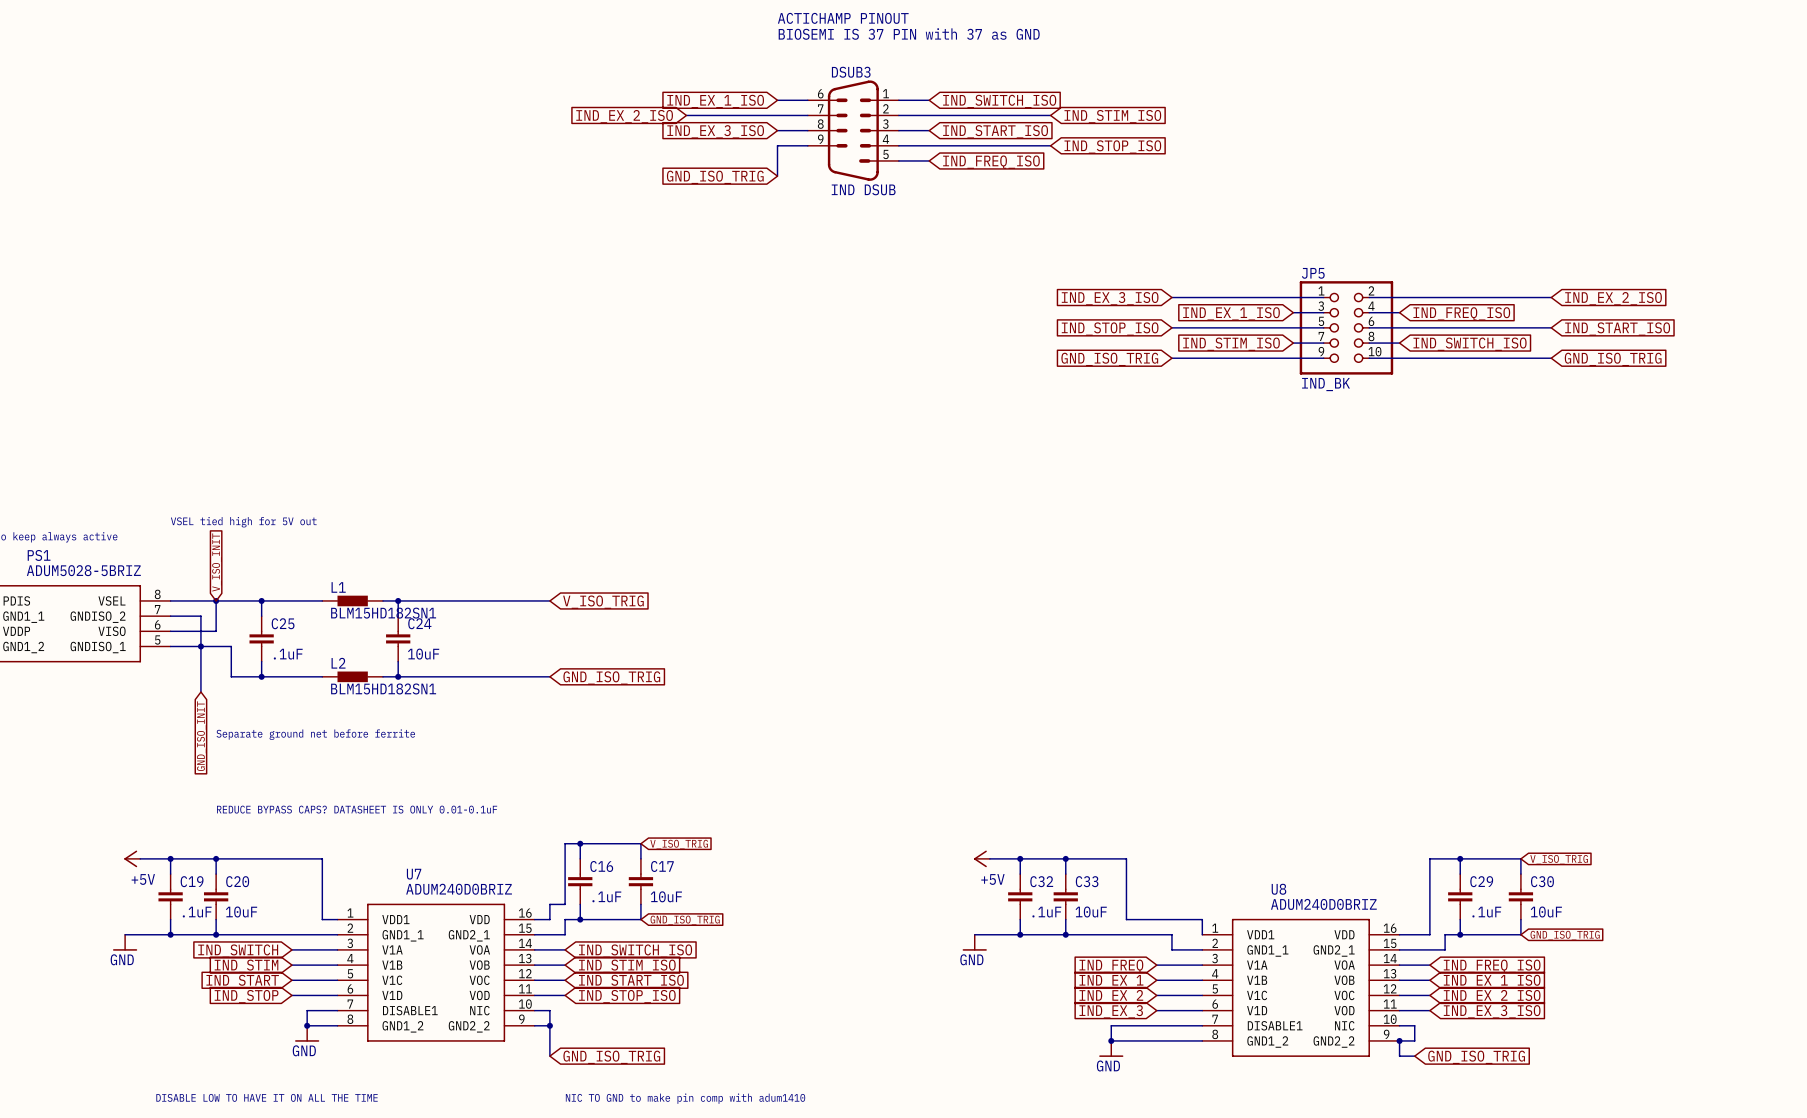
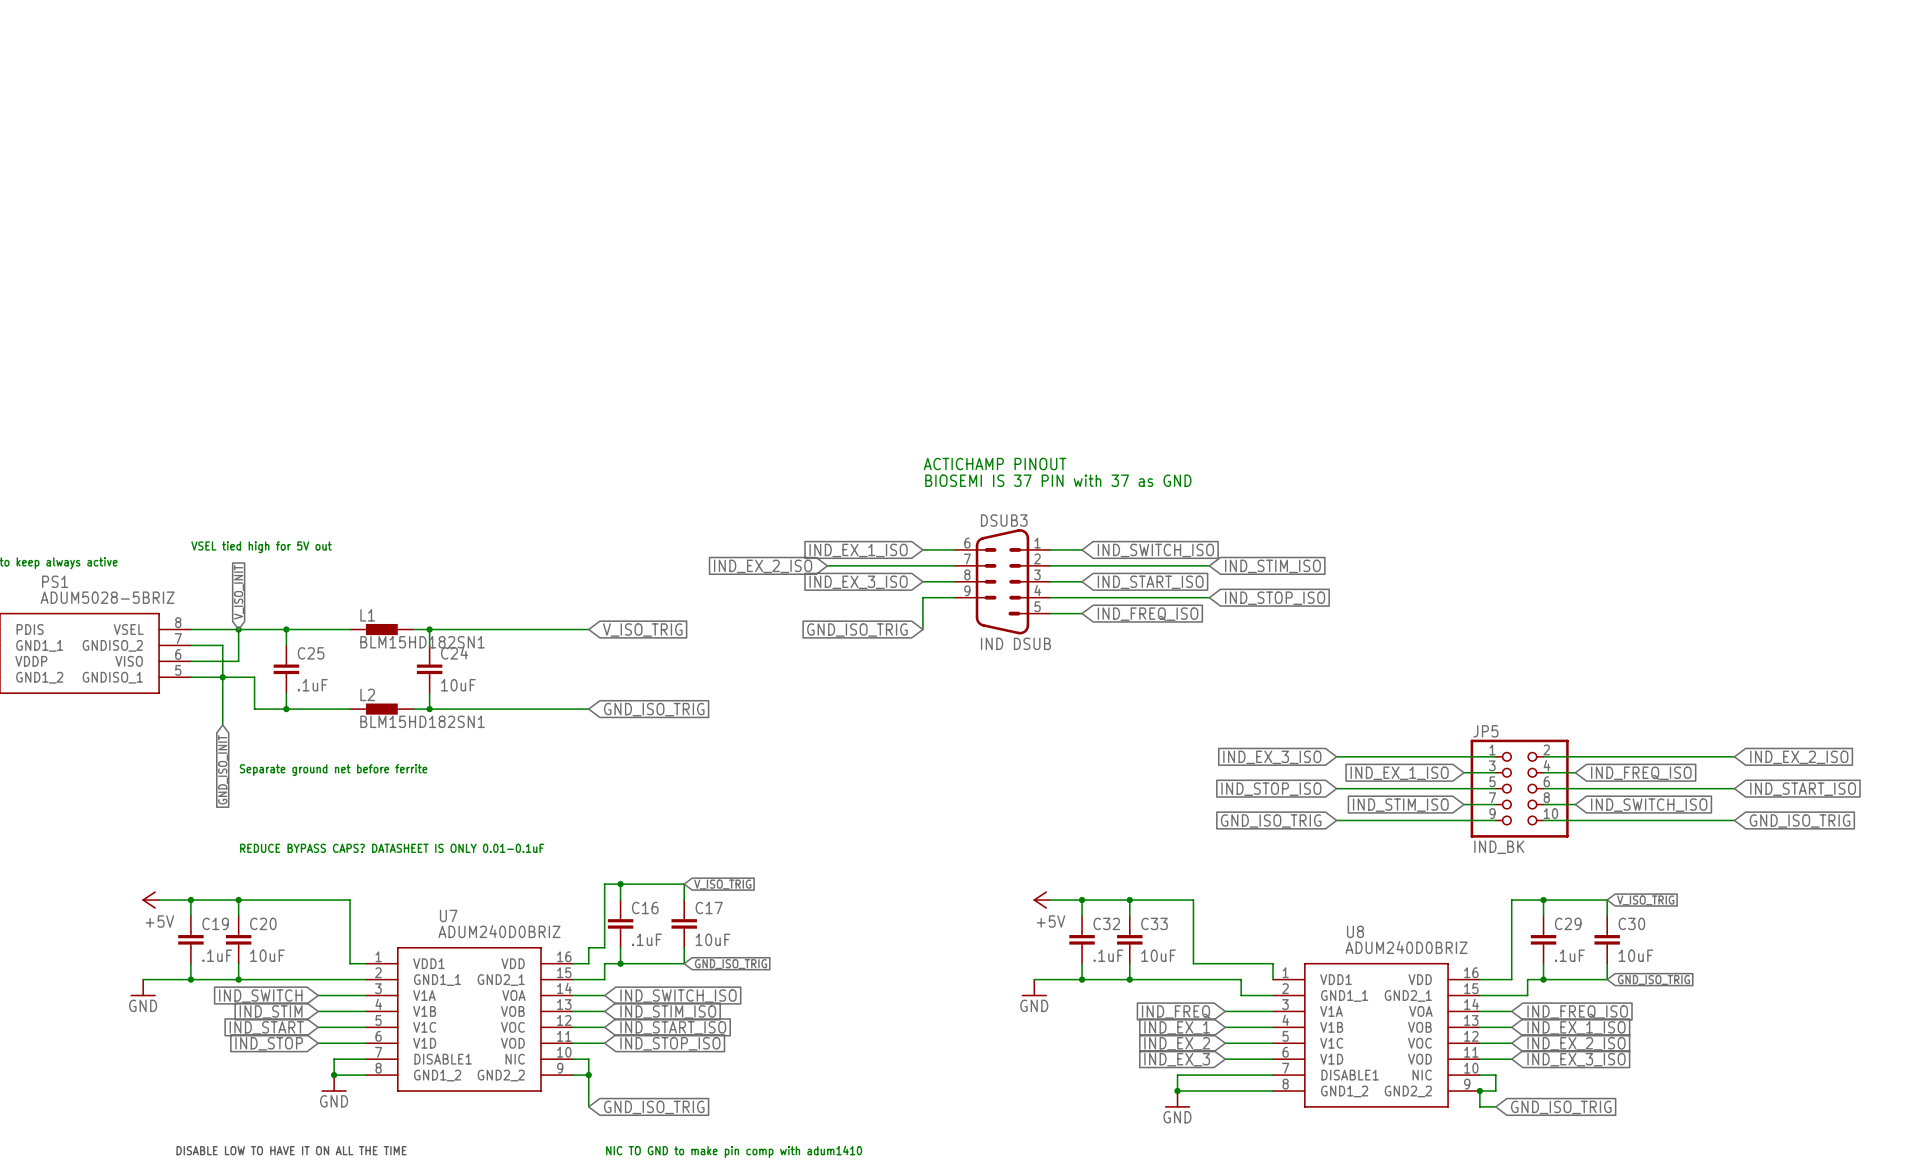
text: ACTICHAMP PINOUT (843, 18) -> none
text: BIOSEMI IS 37 PIN with 37 as GND (909, 34) -> none
wire: (777, 100) (807, 100) -> none
wire: (898, 100) (929, 100) -> none
global label: IND_EX_1_ISO (715, 101) -> none
global label: IND_SWITCH_ISO (999, 101) -> none
wire: (686, 115) (807, 115) -> none
wire: (898, 115) (1050, 115) -> none
global label: IND_EX_2_ISO (624, 116) -> none
global label: IND_STIM_ISO (1112, 116) -> none
wire: (777, 130) (807, 130) -> none
DSUB3 position: (853, 130) -> (1002, 581)
wire: (898, 130) (929, 130) -> none
global label: IND_EX_3_ISO (715, 131) -> none
global label: IND_START_ISO (995, 131) -> none
wire: (807, 145) (777, 145) (777, 176) -> none
wire: (898, 145) (1050, 145) -> none
global label: IND_STOP_ISO (1112, 147) -> none
wire: (898, 160) (929, 160) -> none
global label: IND_FREQ_ISO (991, 162) -> none
global label: GND_ISO_TRIG (715, 177) -> none
wire: (1171, 297) (1323, 297) -> none
wire: (1369, 297) (1551, 297) -> none
global label: IND_EX_3_ISO (1110, 298) -> none
global label: IND_EX_2_ISO (1613, 298) -> none
wire: (1293, 312) (1323, 312) -> none
wire: (1369, 312) (1399, 312) -> none
global label: IND_EX_1_ISO (1231, 313) -> none
global label: IND_FREQ_ISO (1461, 313) -> none
wire: (1171, 327) (1323, 327) -> none
JP5 position: (1346, 327) -> (1519, 788)
wire: (1369, 327) (1551, 327) -> none
global label: IND_STOP_ISO (1110, 329) -> none
global label: IND_START_ISO (1617, 329) -> none
wire: (1293, 343) (1323, 343) -> none
wire: (1369, 343) (1399, 343) -> none
global label: IND_STIM_ISO (1231, 344) -> none
global label: IND_SWITCH_ISO (1470, 344) -> none
wire: (1171, 358) (1323, 358) -> none
wire: (1369, 358) (1551, 358) -> none
global label: GND_ISO_TRIG (1109, 359) -> none
global label: GND_ISO_TRIG (1613, 359) -> none
text: none -> ACTICHAMP PINOUT (995, 464)
text: none -> BIOSEMI IS 37 PIN with 37 as GND (1058, 480)
wire: none -> (922, 549) (954, 549)
wire: none -> (1050, 549) (1082, 549)
global label: none -> IND_EX_1_ISO (858, 550)
global label: none -> IND_SWITCH_ISO (1155, 550)
wire: none -> (827, 565) (954, 565)
wire: none -> (1050, 565) (1209, 565)
global label: none -> IND_EX_2_ISO (763, 566)
global label: none -> IND_STIM_ISO (1272, 566)
wire: none -> (922, 581) (954, 581)
wire: none -> (1050, 581) (1082, 581)
global label: none -> IND_EX_3_ISO (858, 582)
global label: none -> IND_START_ISO (1150, 582)
wire: none -> (954, 597) (922, 597) (922, 629)
wire: none -> (1050, 597) (1209, 597)
global label: none -> IND_STOP_ISO (1275, 598)
wire: none -> (1050, 613) (1082, 613)
global label: none -> IND_FREQ_ISO (1148, 614)
global label: none -> GND_ISO_TRIG (857, 630)
wire: none -> (1336, 756) (1495, 756)
wire: none -> (1543, 756) (1734, 756)
global label: none -> IND_EX_3_ISO (1272, 757)
global label: none -> IND_EX_2_ISO (1799, 757)
wire: none -> (1463, 772) (1495, 772)
wire: none -> (1543, 772) (1575, 772)
global label: none -> IND_EX_1_ISO (1399, 773)
global label: none -> IND_FREQ_ISO (1641, 773)
wire: none -> (1336, 788) (1495, 788)
wire: none -> (1543, 788) (1734, 788)
global label: none -> IND_STOP_ISO (1271, 789)
global label: none -> IND_START_ISO (1803, 789)
wire: none -> (1463, 804) (1495, 804)
wire: none -> (1543, 804) (1575, 804)
global label: none -> IND_STIM_ISO (1400, 805)
global label: none -> IND_SWITCH_ISO (1649, 805)
wire: none -> (1336, 820) (1495, 820)
wire: none -> (1543, 820) (1734, 820)
global label: none -> GND_ISO_TRIG (1271, 821)
global label: none -> GND_ISO_TRIG (1800, 821)

